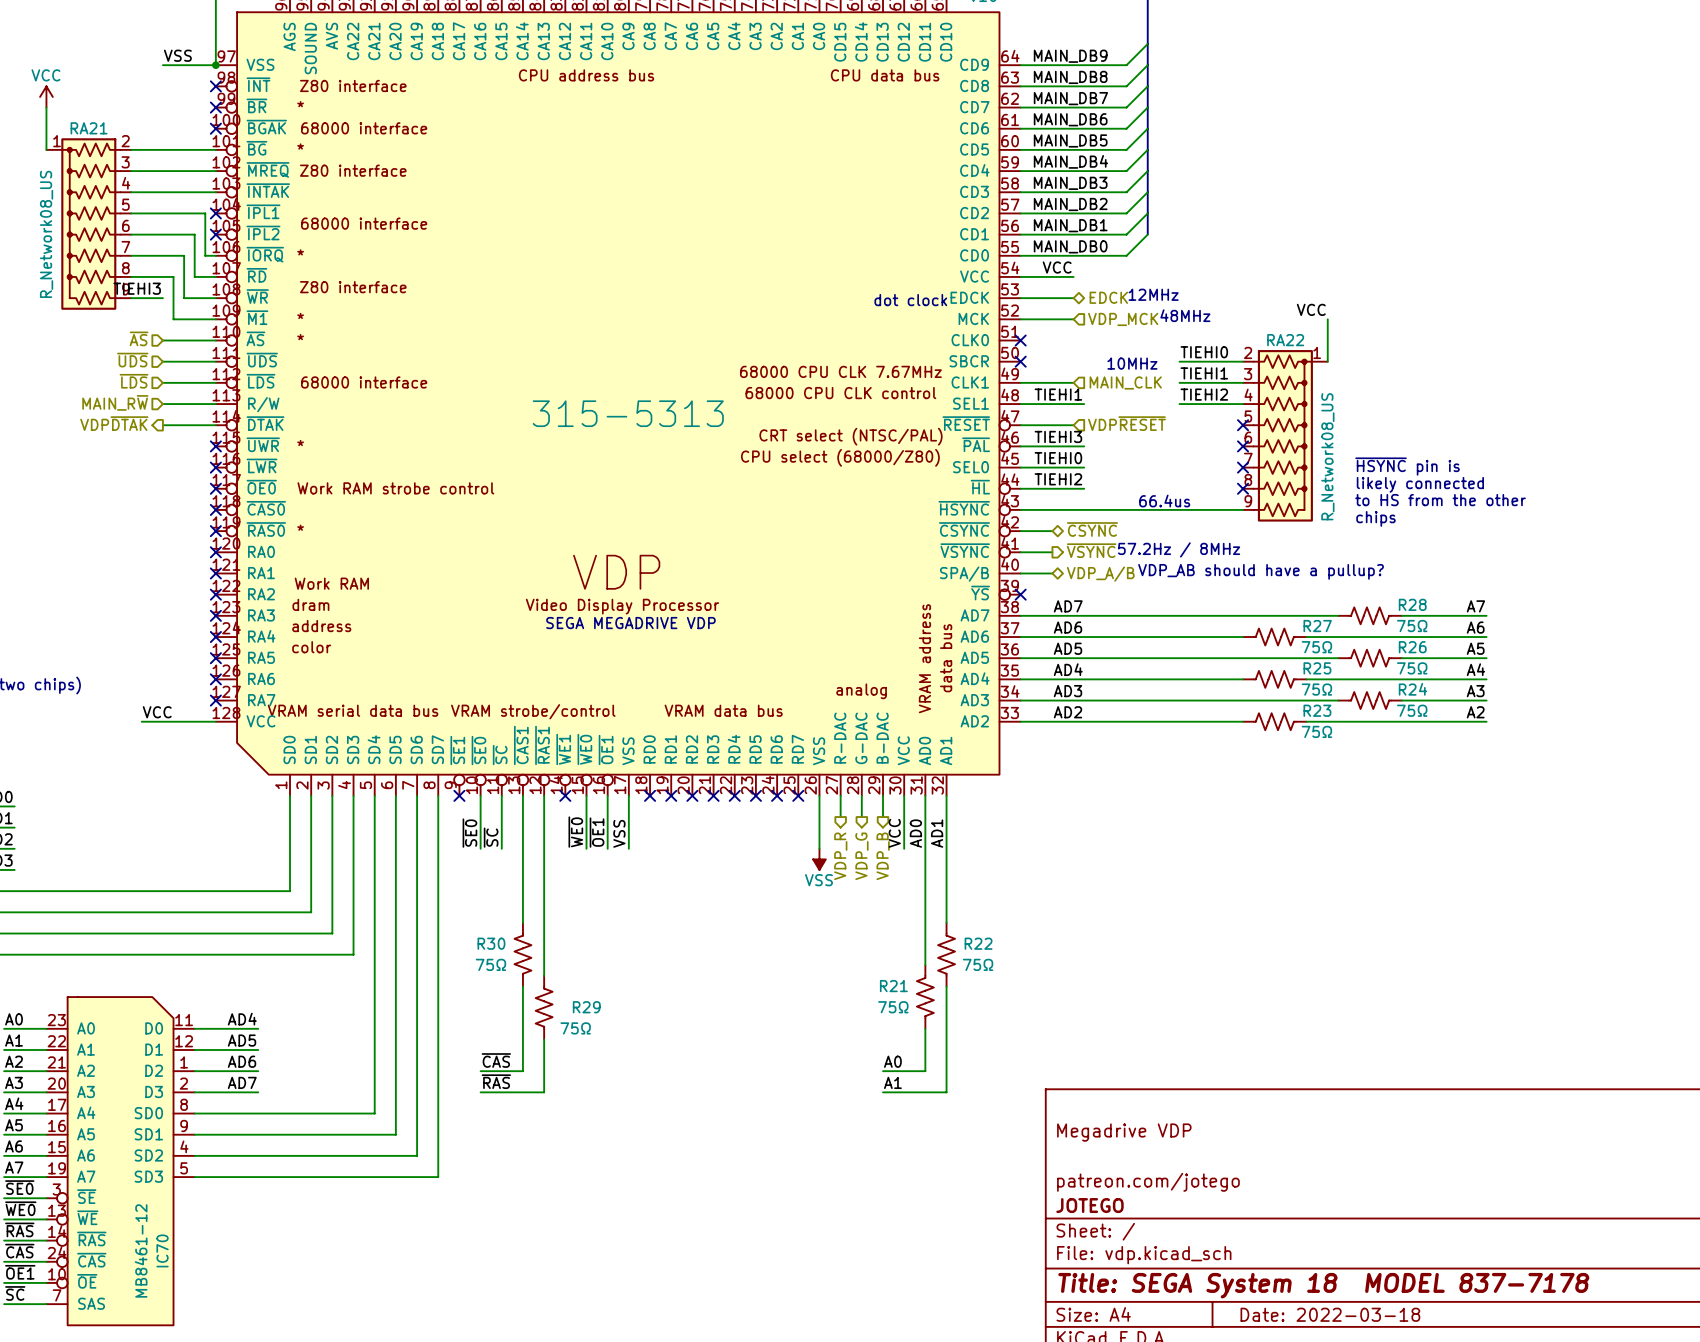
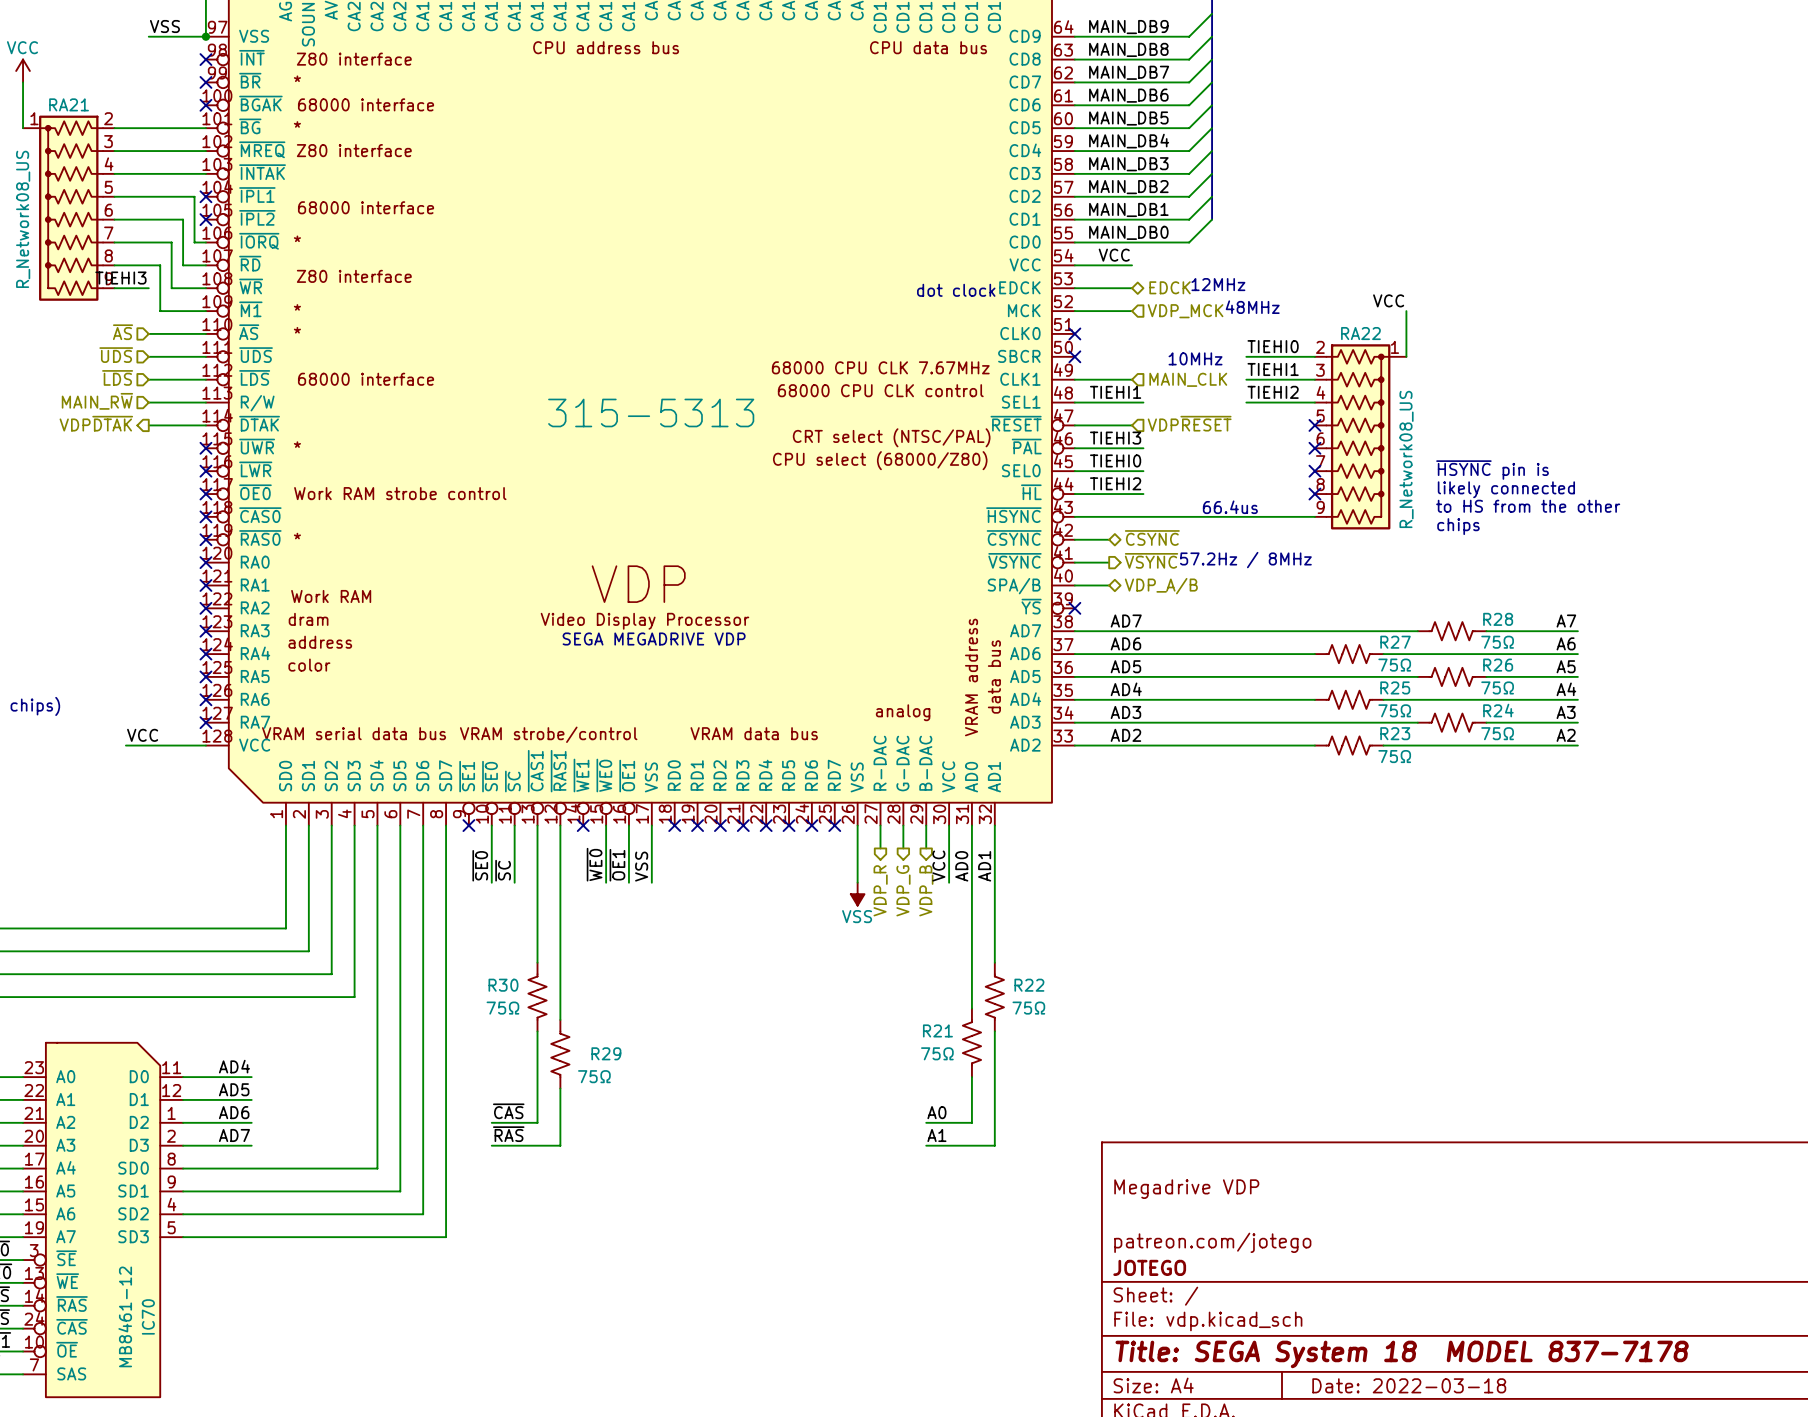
text: VDP_AB should have a pullup? (1261, 571) -> none

